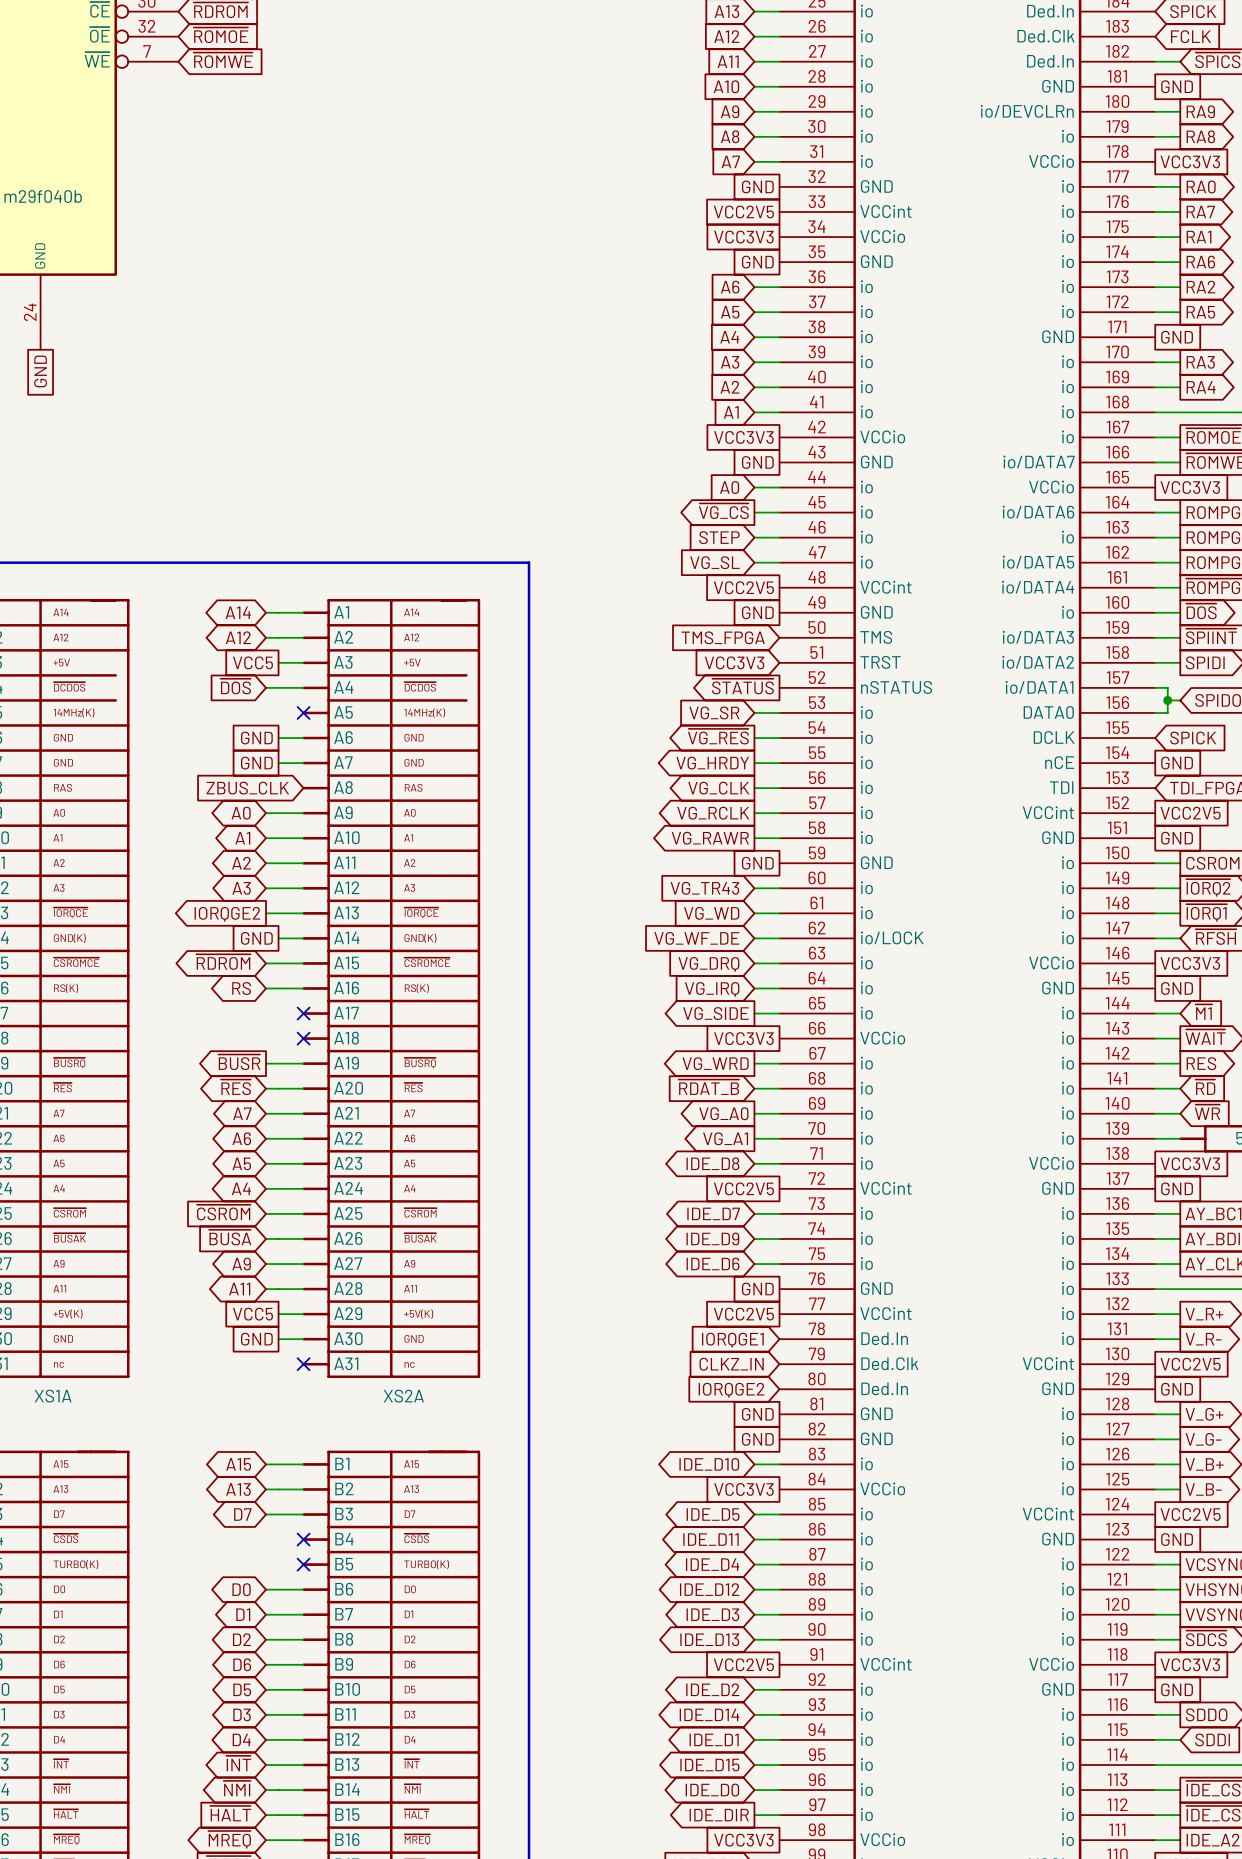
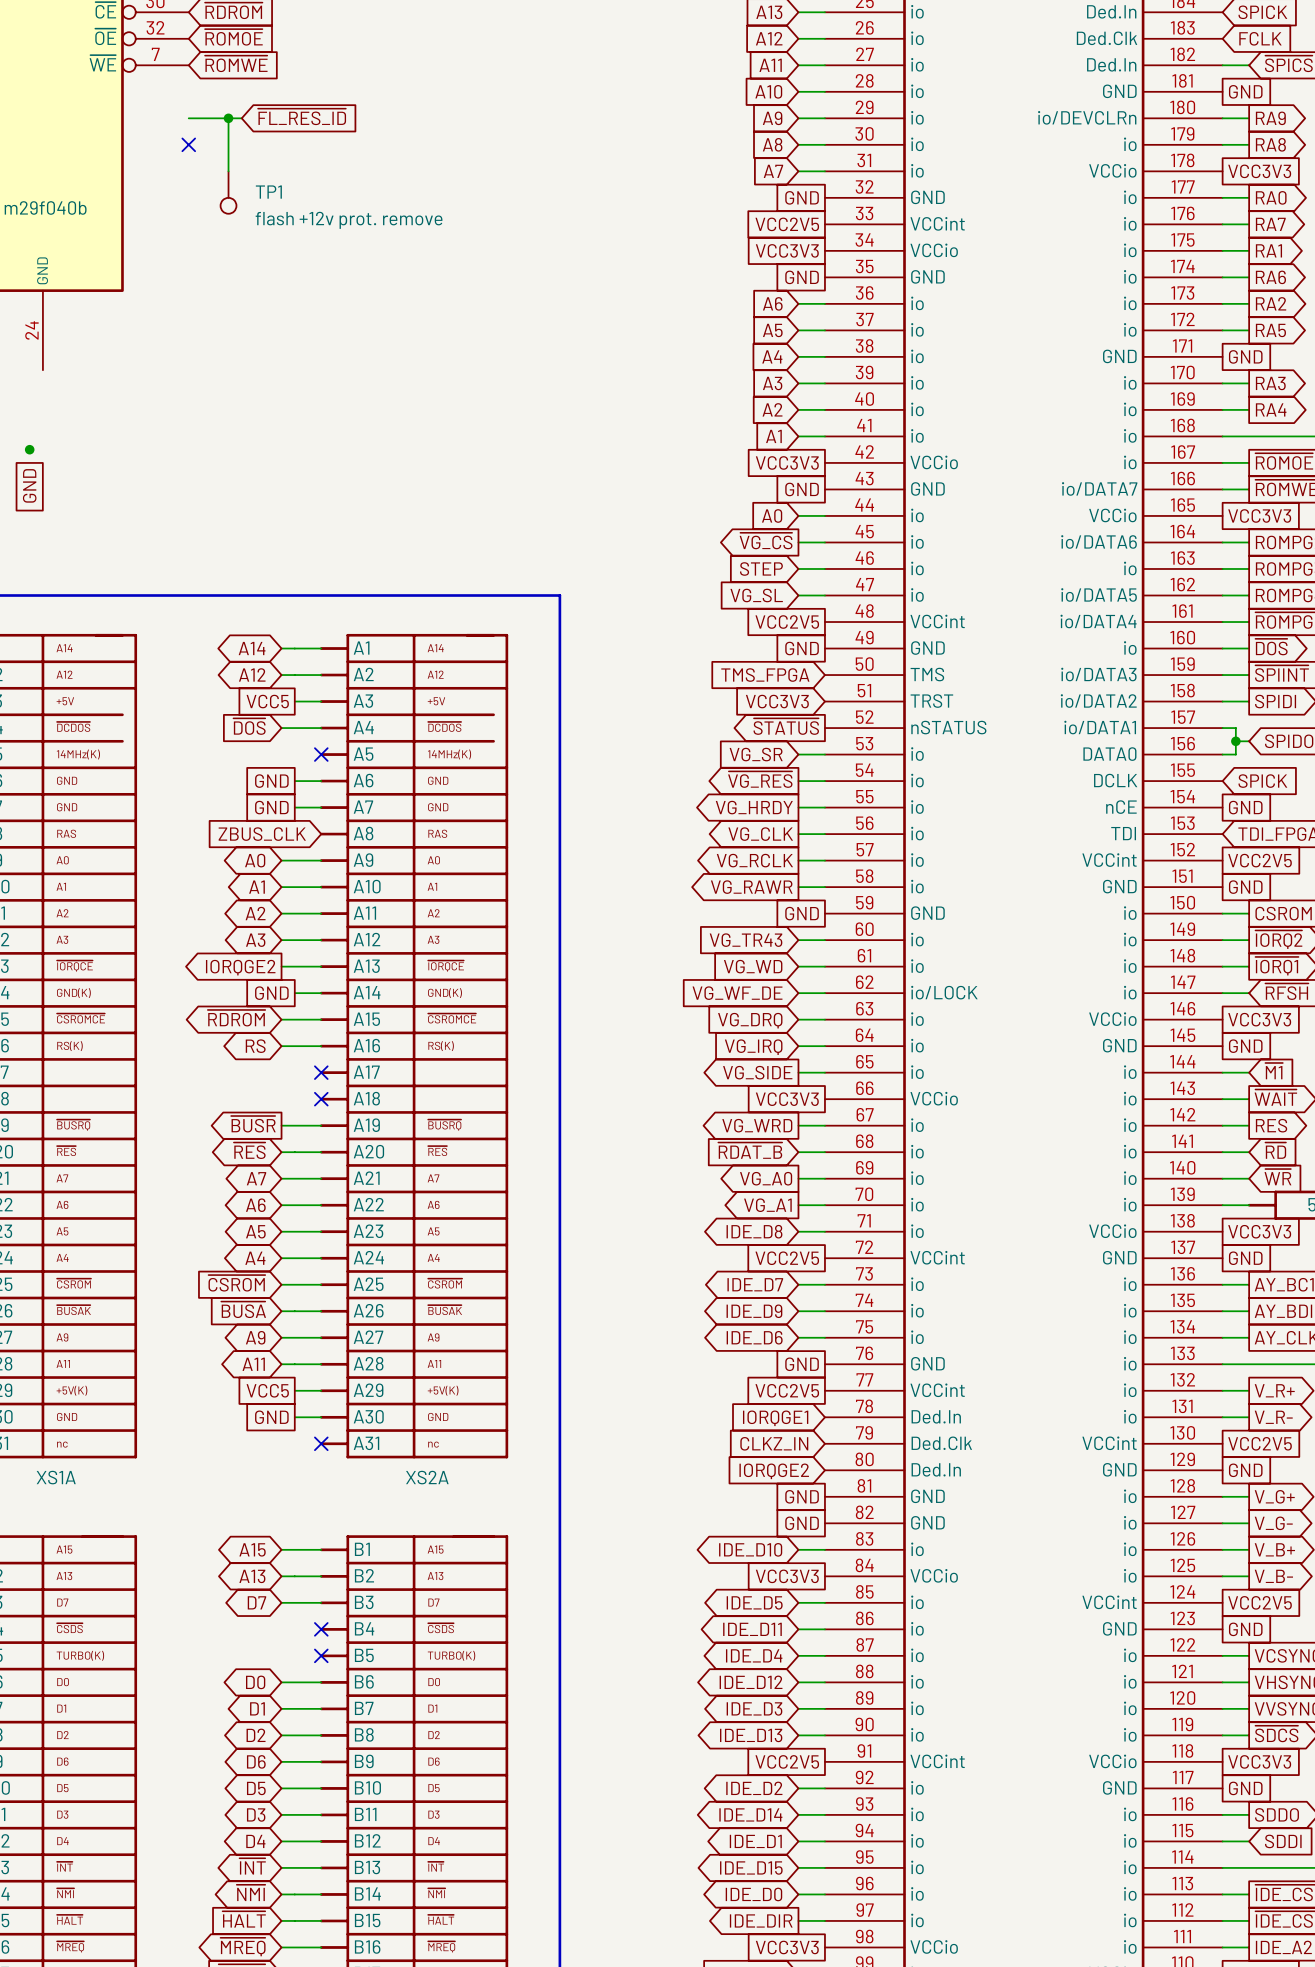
global label: none -> ~{FL_RES_ID} (302, 116)
wire: none -> (188, 118) (241, 118)
wire: none -> (228, 118) (228, 171)
junction: none -> (228, 118)
no-connect mark: none -> (188, 144)
TP1: none -> flash +12v prot. remove (228, 192)
global label position: GND (40, 371) -> GND (29, 485)
junction: none -> (29, 449)

